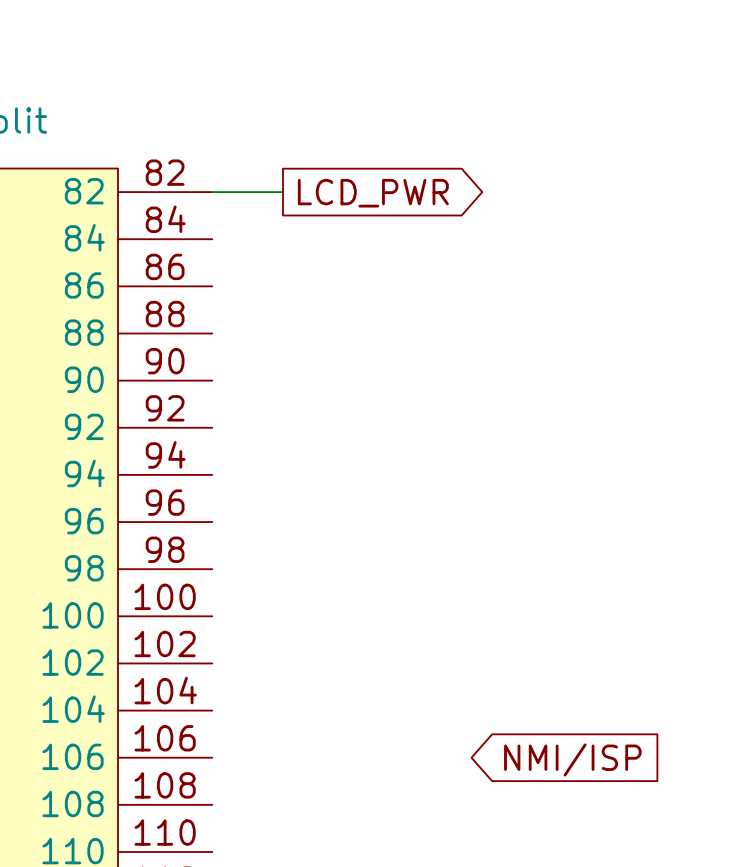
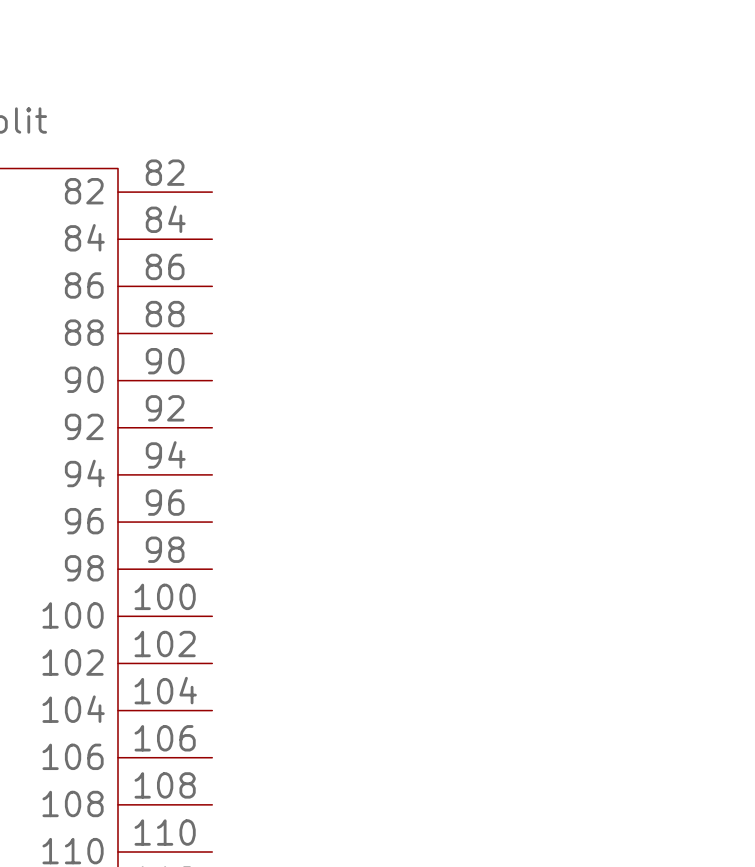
wire: (212, 192) (282, 192) -> none
global label: LCD_PWR (373, 193) -> none
global label: NMI/ISP (572, 759) -> none

